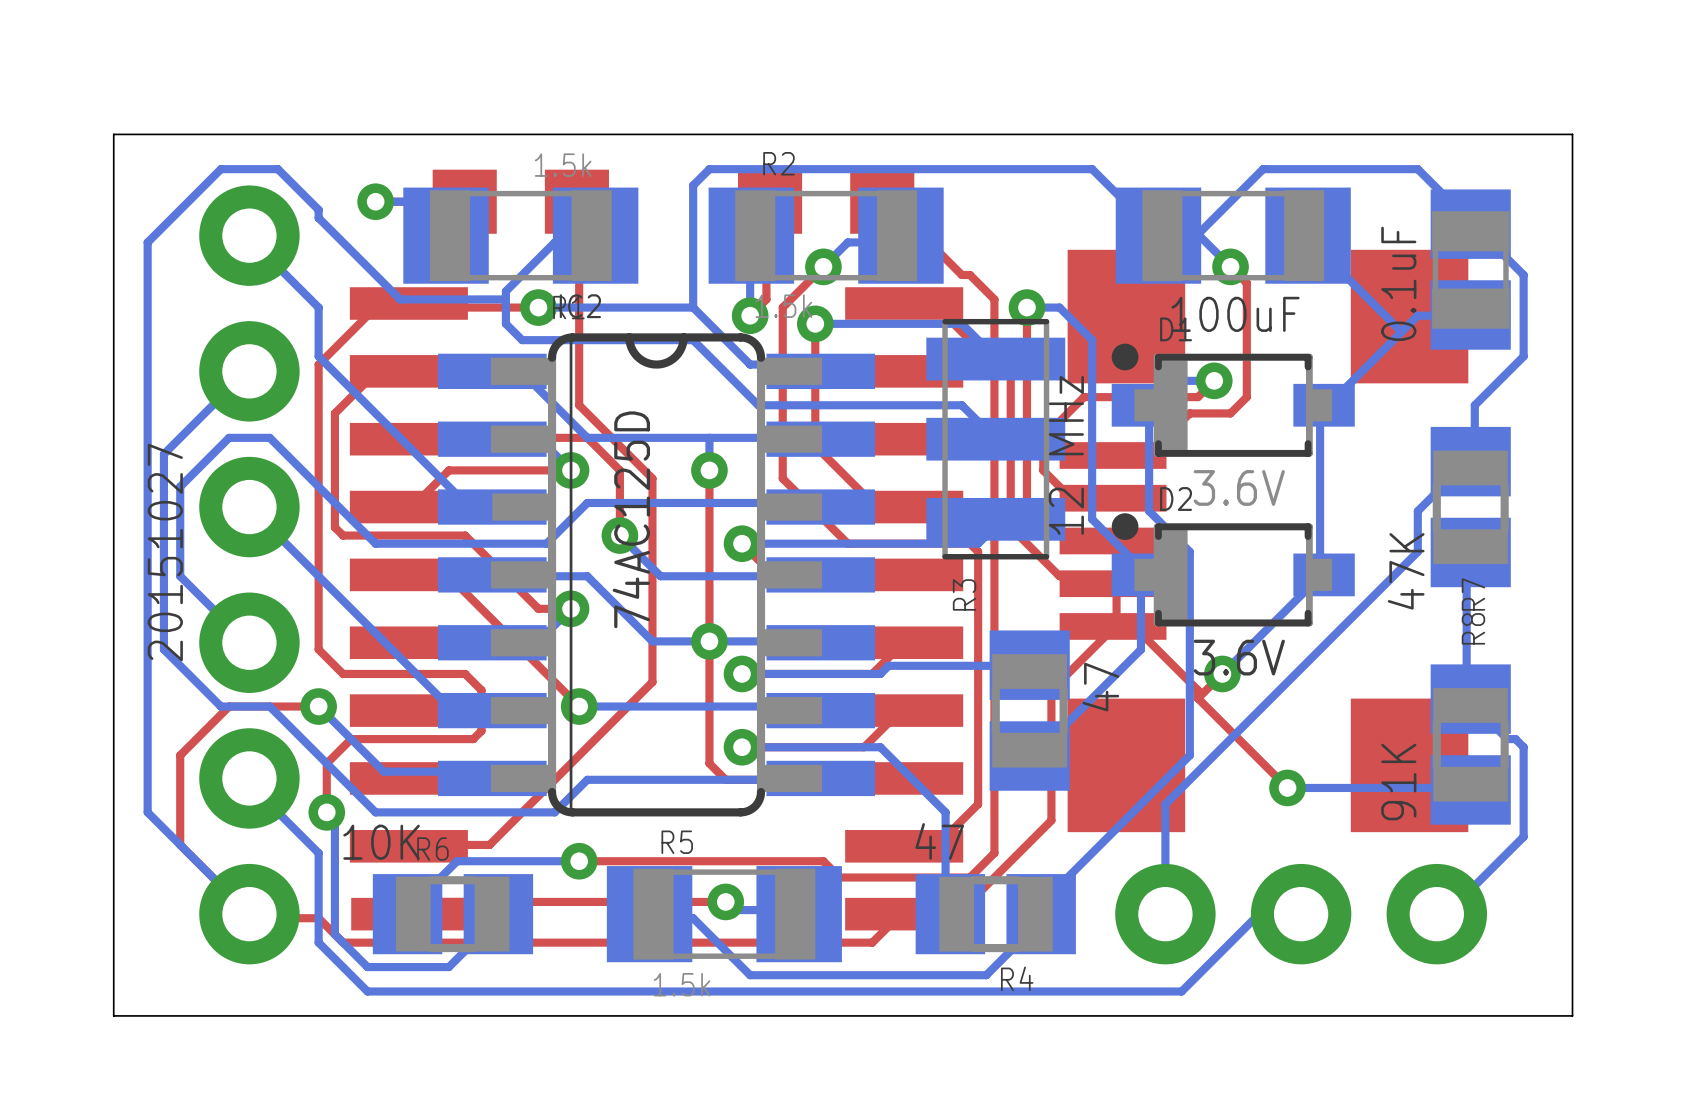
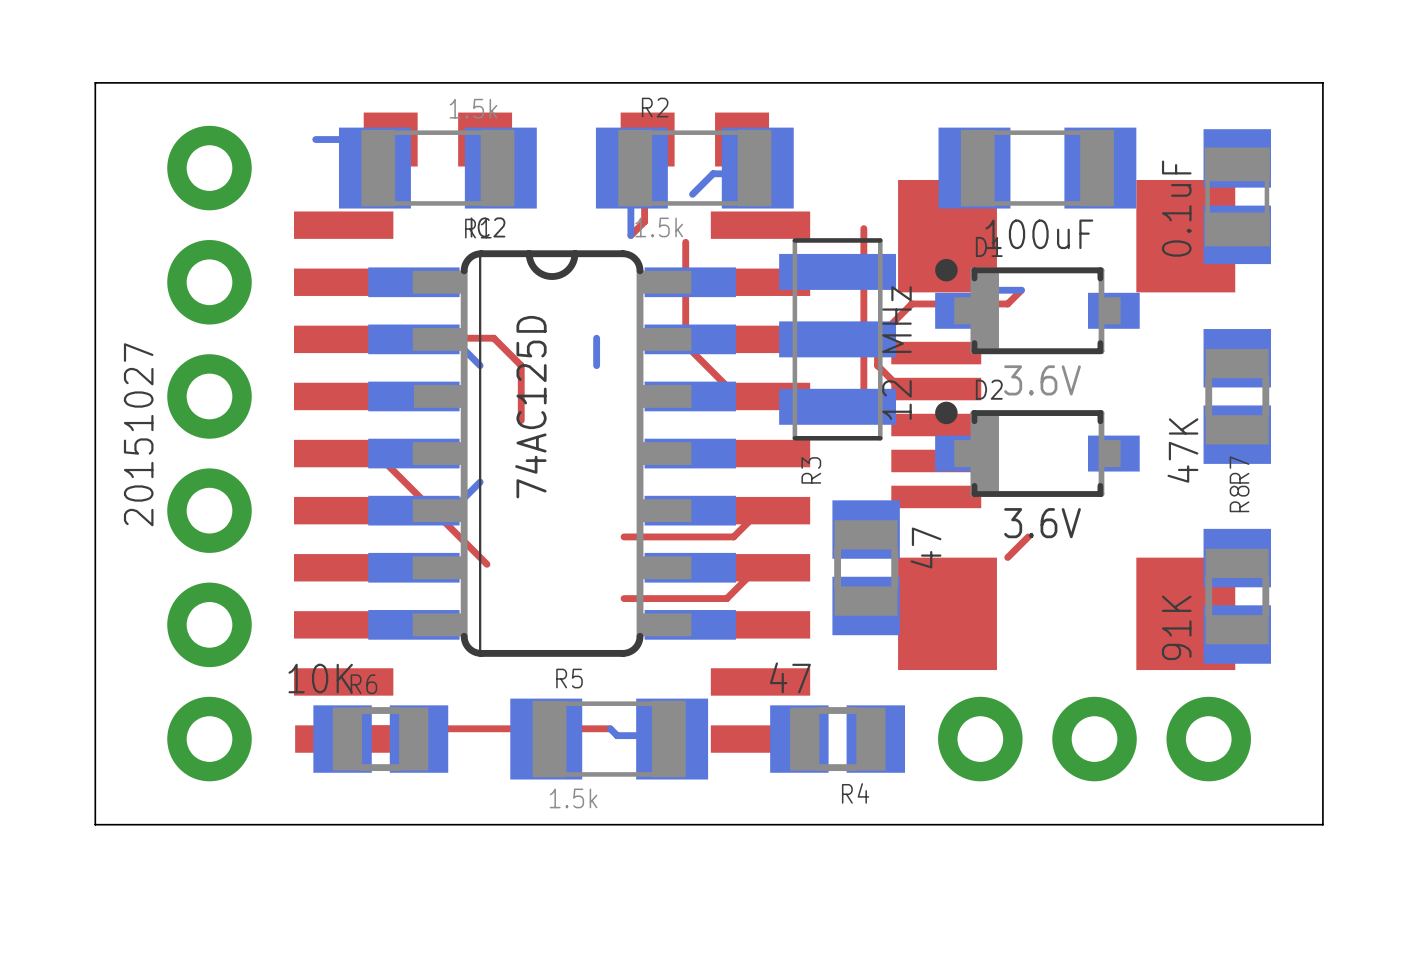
via: (375, 201) -> none
top track: (576, 201) (579, 201) (579, 405) (652, 478) (652, 682) (489, 844) (408, 846) -> none
top track: (882, 201) (888, 201) (961, 275) (970, 275) (994, 299) (994, 340) (1010, 356) (1010, 527) (1059, 576) (1108, 576) (1113, 583) (1116, 584) (1116, 625) (1113, 626) -> none
bottom track: (1197, 234) (1263, 169) (1417, 169) (1523, 275) (1523, 356) (1474, 405) (1474, 454) (1470, 461) (1466, 462) (1417, 511) (1417, 551) (1165, 804) (1165, 914) -> none
bottom track: (1197, 234) (1230, 266) -> none
bottom track: (249, 235) (253, 242) (318, 307) (318, 356) (465, 502) (489, 502) (492, 507) -> none
bottom track: (595, 235) (595, 242) (554, 242) (505, 291) (505, 323) (522, 340) (693, 340) (758, 405) (961, 405) (995, 439) -> none
bottom track: (1158, 235) (1092, 169) (709, 169) (693, 185) (693, 307) -> none
bottom track: (1308, 235) (1311, 242) (1401, 332) -> none
top track: (823, 266) (782, 307) (782, 478) (847, 543) (970, 543) (978, 551) (978, 804) (937, 844) (904, 846) -> none
via: (823, 266) -> none
top track: (1230, 266) (1246, 283) (1246, 397) (1230, 413) (1189, 413) (1149, 454) (1113, 455) -> none
via: (1230, 266) -> none
bottom track: (505, 299) (400, 299) (318, 218) (318, 209) (277, 169) (220, 169) (147, 242) (147, 812) (249, 914) -> none
top track: (904, 303) (904, 307) (937, 307) (994, 364) (994, 853) (970, 877) (839, 877) (823, 861) (579, 861) -> none
top track: (538, 307) (416, 307) (408, 303) (408, 307) (375, 307) (318, 364) (318, 649) (343, 673) (465, 673) (481, 690) (481, 730) (473, 739) (351, 739) (326, 763) (326, 812) -> none
via: (538, 307) -> none
bottom track: (693, 307) (750, 364) (815, 364) (820, 371) -> none
bottom track: (693, 307) (538, 307) -> none
bottom track: (1026, 307) (1059, 307) (1092, 340) (1092, 519) (1140, 568) (1142, 574) (1140, 649) (1035, 755) (1029, 756) -> none
via: (1026, 307) -> none
bottom track: (1470, 314) (1417, 315) (1328, 405) (1320, 405) (1320, 568) (1324, 574) (1320, 576) (1222, 673) -> none
via: (750, 315) -> none
bottom track: (815, 323) (961, 323) (995, 359) -> none
via: (815, 323) -> none
bottom track: (249, 371) (245, 372) (163, 454) (163, 649) (220, 706) (269, 706) (375, 812) (554, 812) (587, 779) (820, 778) -> none
top track: (408, 371) (375, 372) (334, 413) (334, 527) (343, 535) (465, 535) (538, 608) (571, 608) -> none
bottom track: (492, 371) (522, 372) (587, 437) (820, 439) -> none
via: (1214, 380) -> none
bottom track: (1142, 405) (1149, 405) (1149, 511) (1189, 551) (1189, 755) (1035, 910) (1043, 918) (986, 975) (750, 975) (693, 918) (652, 918) (649, 914) -> none
top track: (571, 470) (448, 470) (416, 502) (408, 507) -> none
via: (571, 470) -> none
top track: (709, 470) (709, 763) (725, 779) (904, 778) -> none
via: (709, 470) -> none
bottom track: (249, 507) (448, 706) (489, 706) (492, 710) -> none
bottom track: (820, 507) (815, 502) (587, 502) (546, 543) (375, 543) (269, 437) (229, 437) (180, 486) (180, 576) (245, 641) (249, 642) -> none
bottom track: (995, 519) (994, 527) (978, 543) (742, 543) -> none
bottom track: (619, 535) (660, 576) (820, 574) -> none
via: (619, 535) -> none
via: (742, 543) -> none
bottom track: (1470, 552) (1466, 559) (1466, 698) (1470, 699) (1474, 706) (1507, 739) (1515, 739) (1523, 747) (1523, 836) (1442, 918) (1436, 914) -> none
bottom track: (492, 574) (587, 576) (652, 641) (820, 642) -> none
via: (571, 608) -> none
top track: (1113, 626) (1116, 633) (1140, 633) (1197, 690) (1197, 698) (1287, 787) -> none
top track: (1113, 626) (1051, 690) (1051, 820) (961, 910) (904, 910) (904, 914) (896, 918) (872, 942) (343, 942) (318, 918) (253, 918) (180, 844) (180, 755) (229, 706) (318, 706) -> none
via: (709, 641) -> none
bottom track: (1029, 665) (888, 665) (880, 673) (742, 673) -> none
via: (742, 673) -> none
via: (1222, 673) -> none
bottom track: (318, 706) (383, 771) (489, 771) (492, 778) -> none
via: (318, 706) -> none
bottom track: (579, 706) (815, 706) (820, 710) -> none
via: (579, 706) -> none
bottom track: (742, 747) (880, 747) (945, 812) (945, 910) (950, 914) -> none
via: (742, 747) -> none
bottom track: (249, 778) (245, 779) (318, 853) (318, 942) (367, 991) (1181, 991) (1254, 918) (1295, 918) (1301, 914) -> none
bottom track: (1287, 787) (1466, 787) (1470, 789) -> none
via: (1287, 787) -> none
bottom track: (326, 812) (334, 820) (334, 934) (367, 967) (448, 967) (497, 918) (498, 914) -> none
via: (326, 812) -> none
bottom track: (579, 861) (457, 861) (408, 910) (407, 914) -> none
via: (579, 861) -> none
via: (725, 901) -> none

